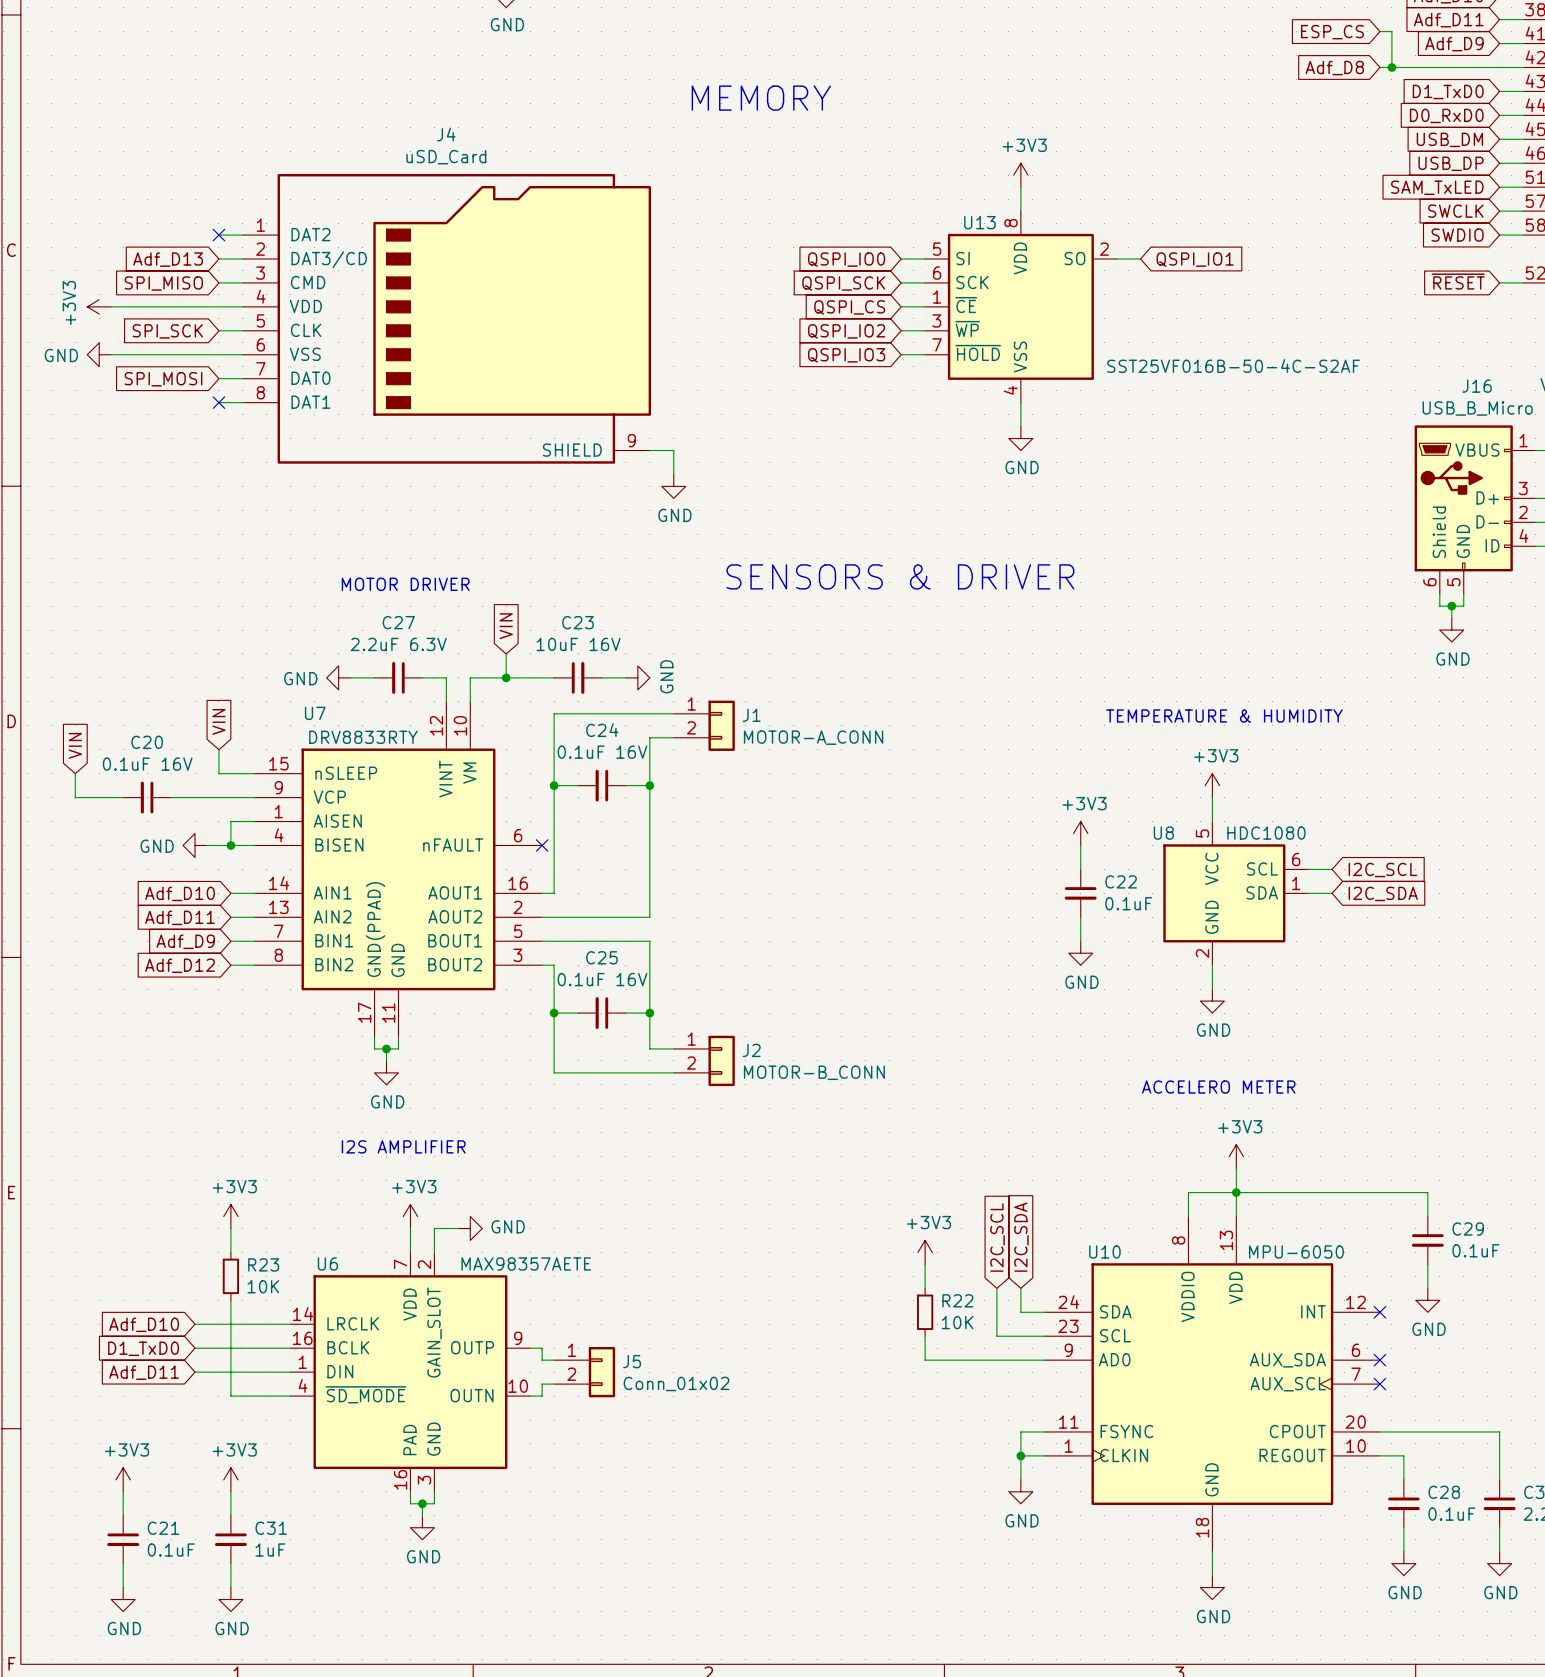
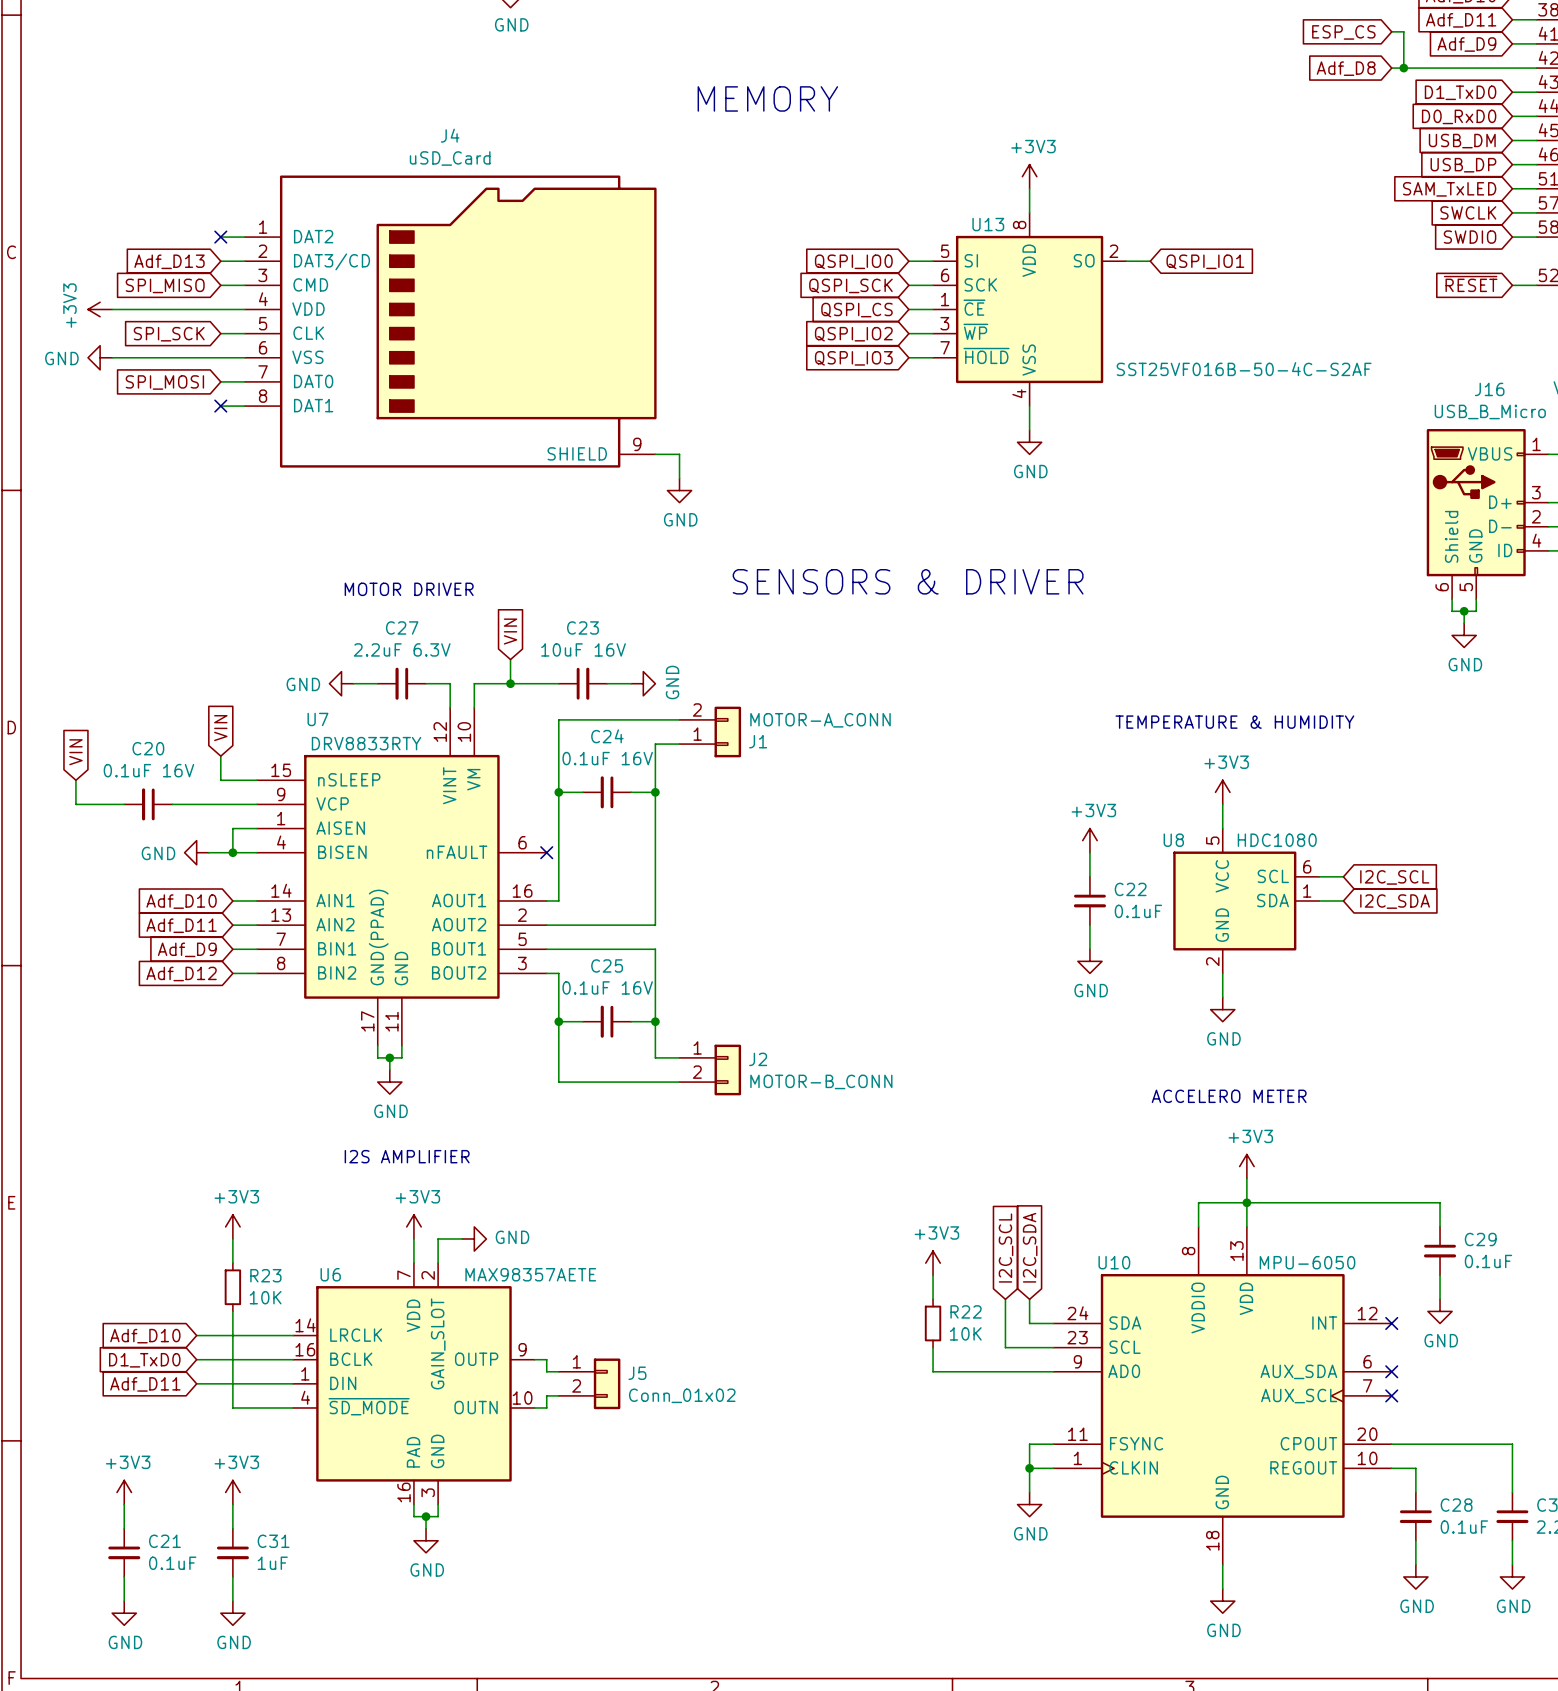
J1 flip: as is (721, 725) -> up-down (727, 731)

